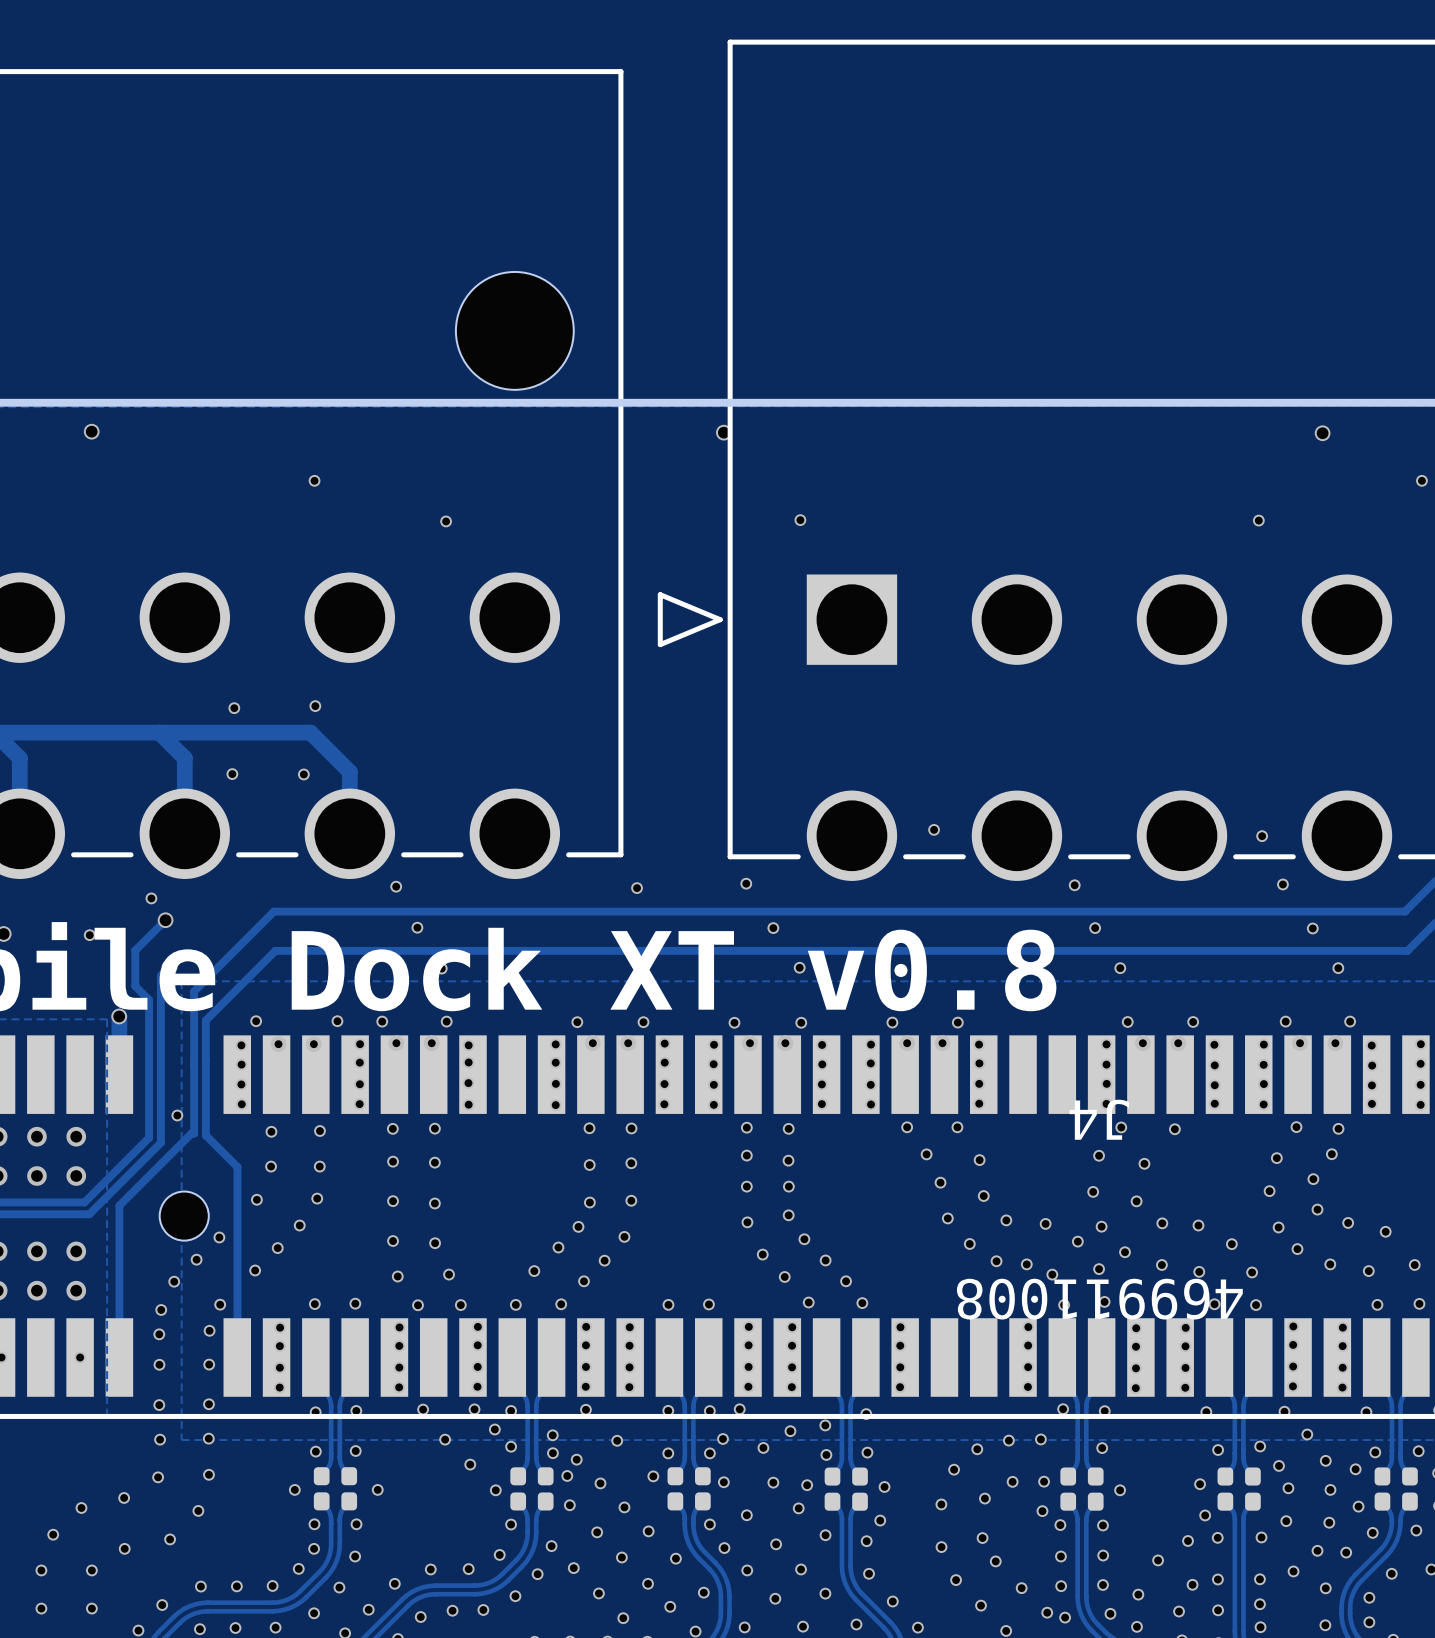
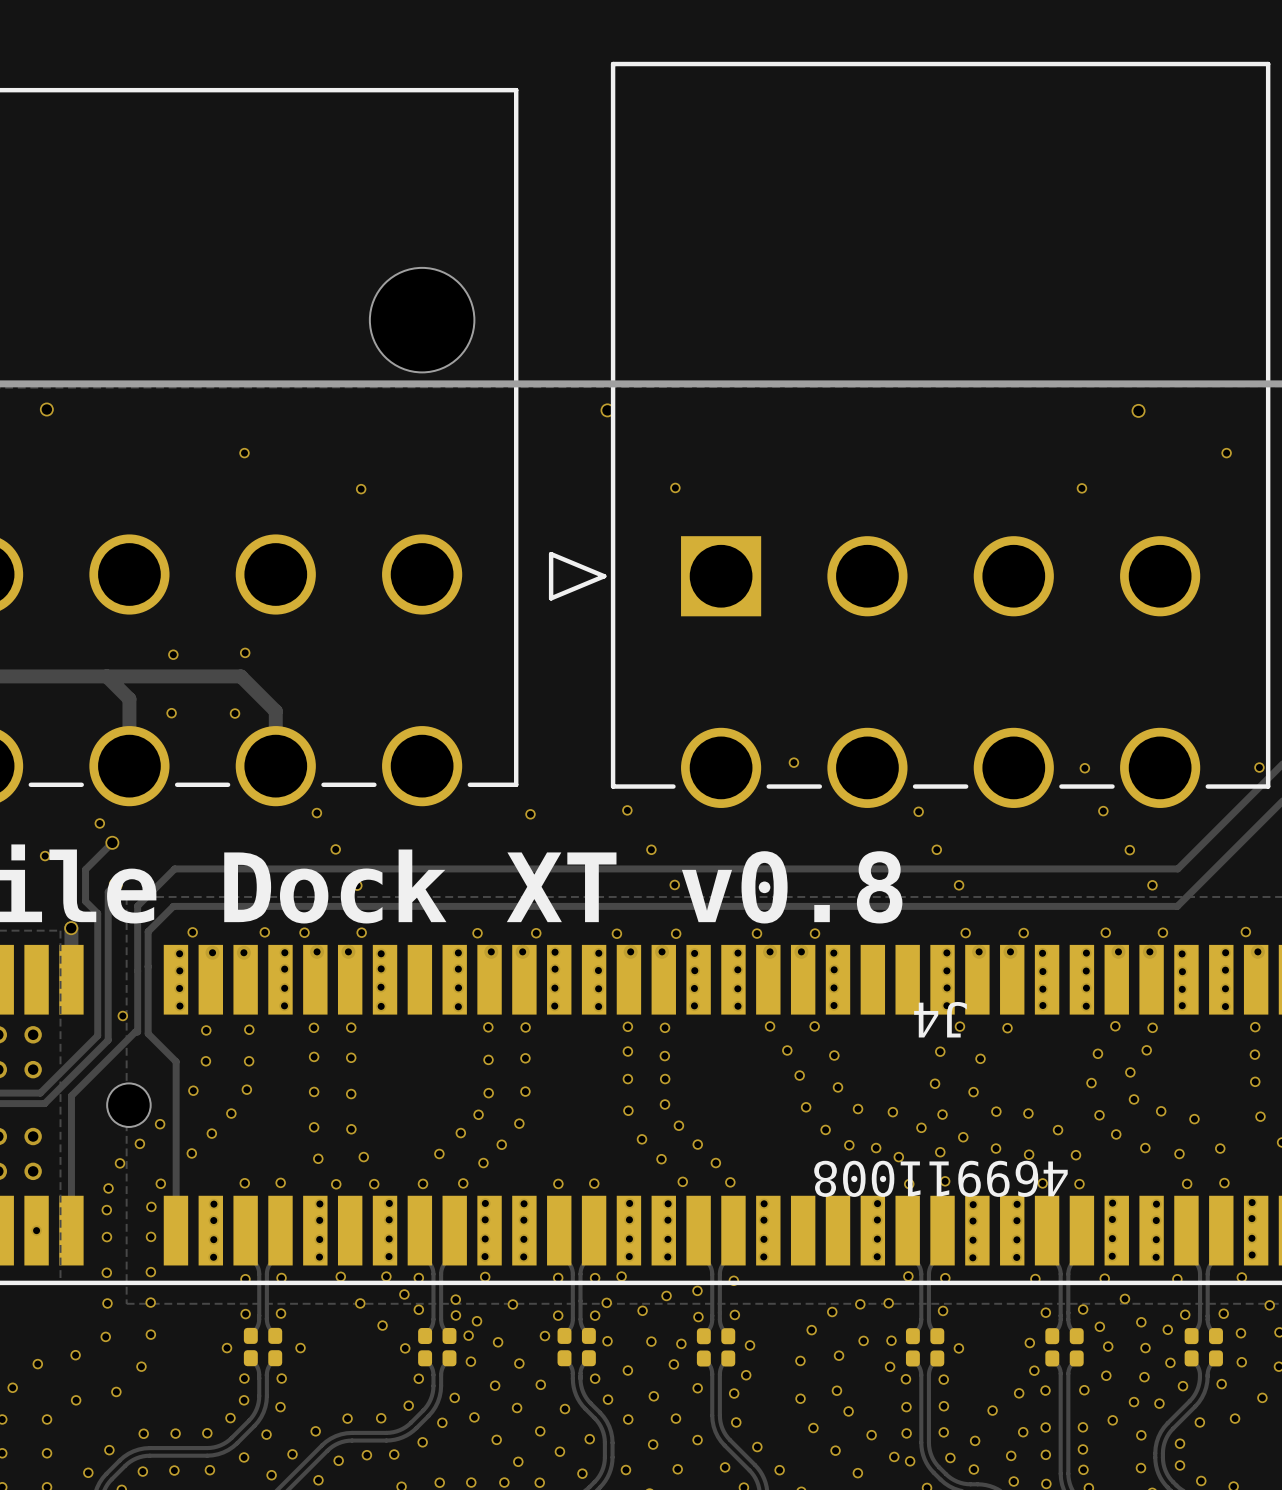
track: (1405, 911) (274, 911) (235, 949) -> (1211, 835) (1177, 868) (174, 868)
track: (1407, 950) (275, 950) (234, 991) -> (1213, 869) (1177, 906) (173, 906)

